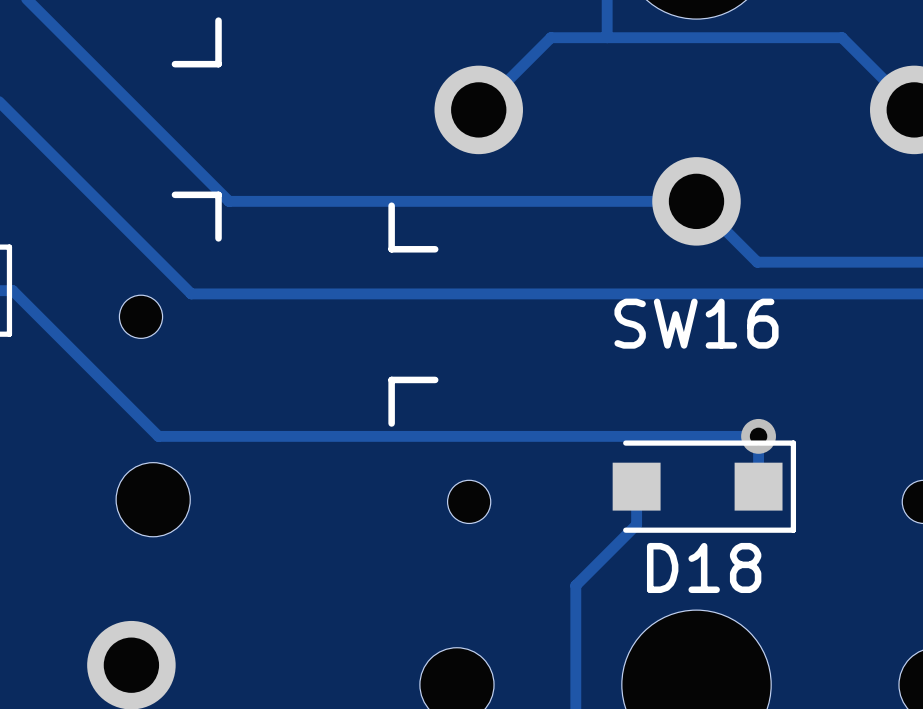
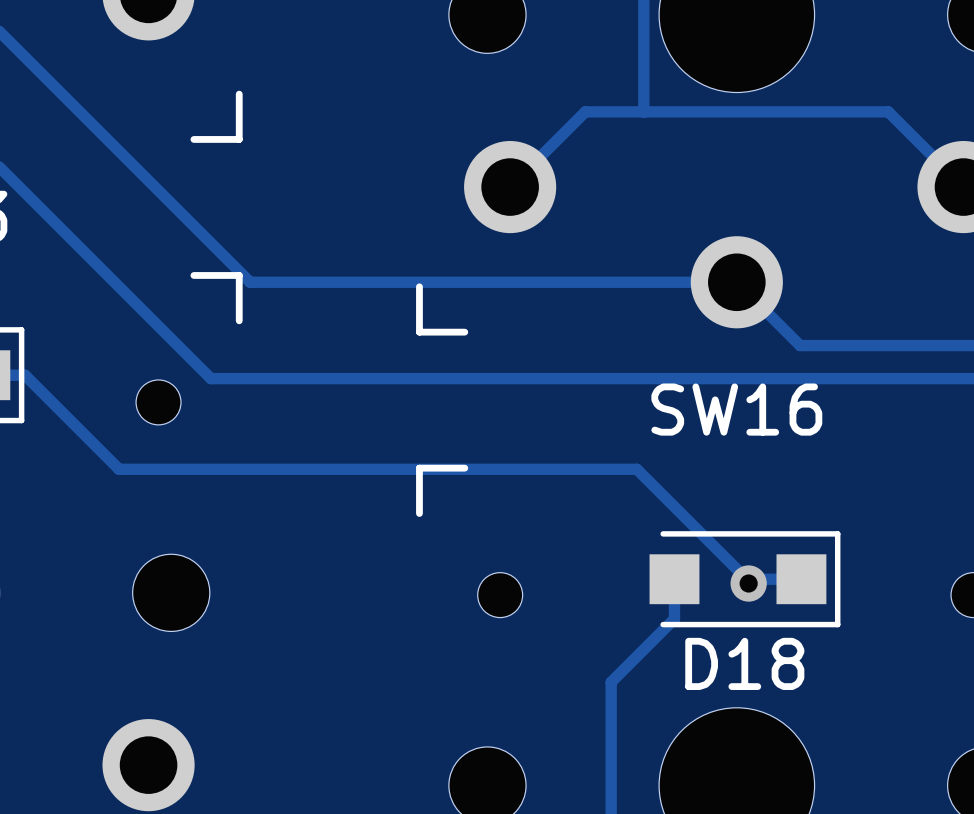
track: (103, 381) (158, 436) (758, 436) (758, 486) -> (119, 469) (636, 469) (748, 581) (748, 583) (752, 579) (801, 579)
via position: (758, 436) -> (748, 583)

